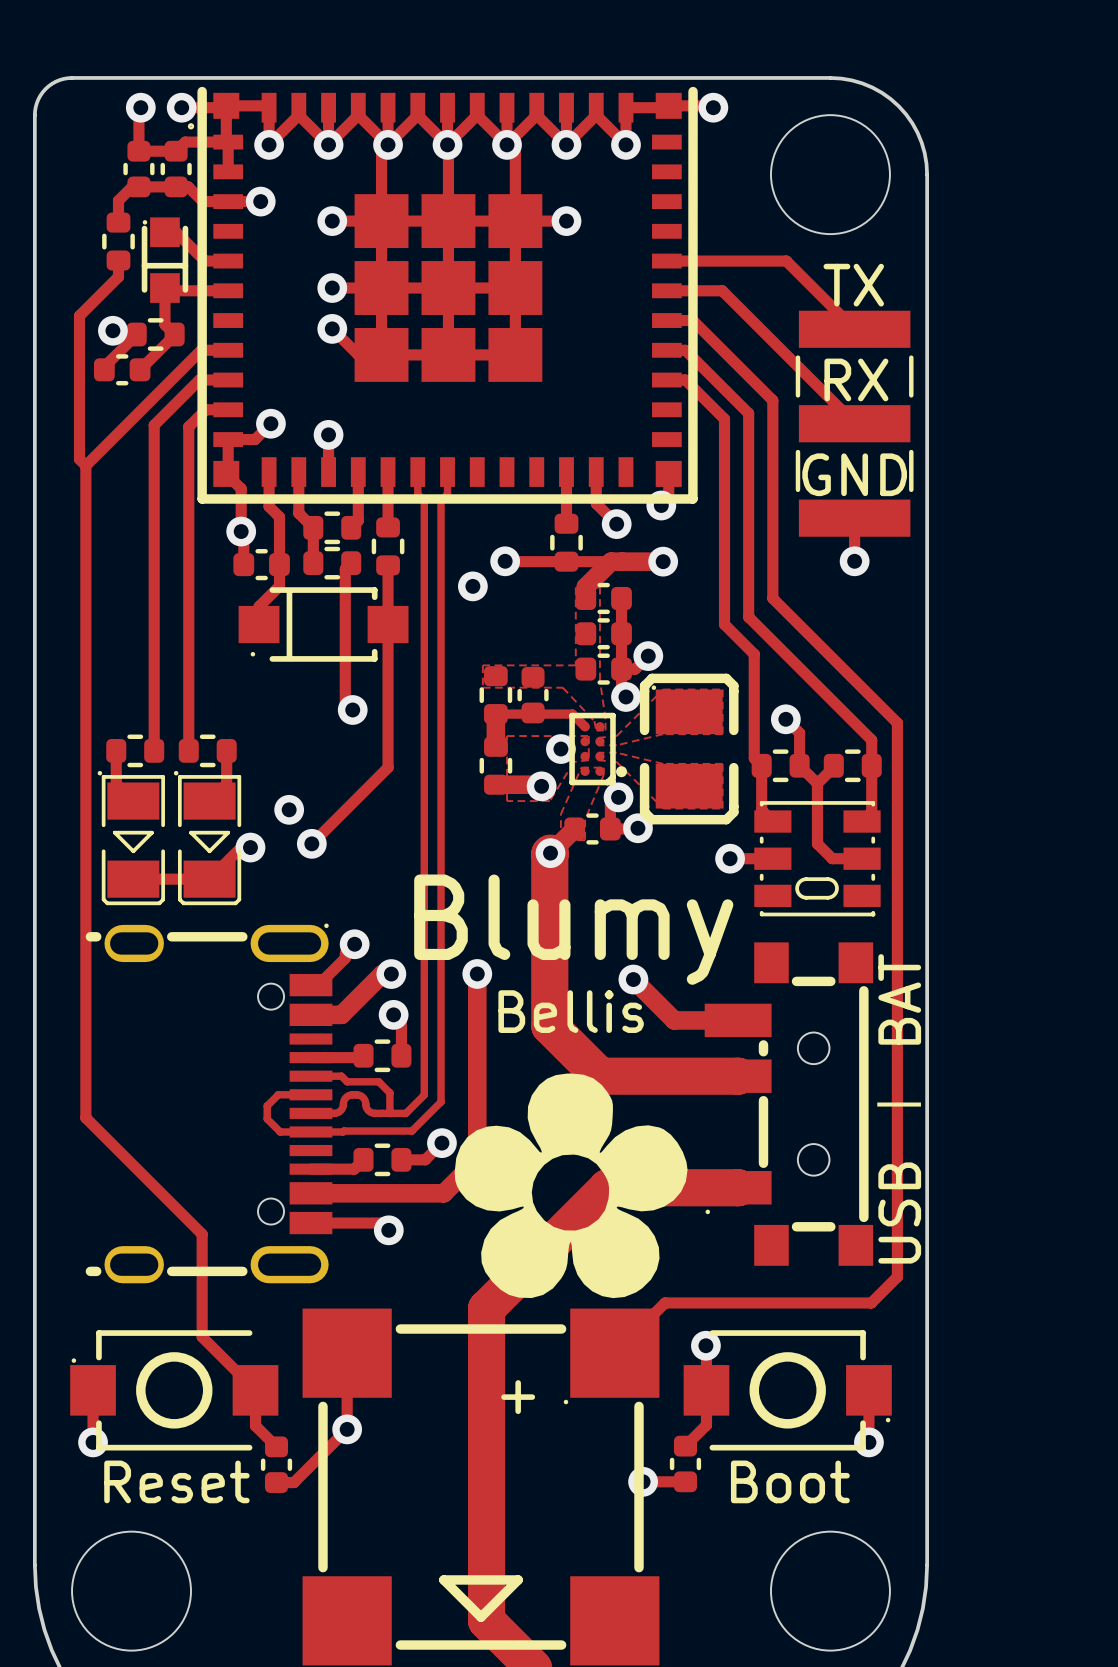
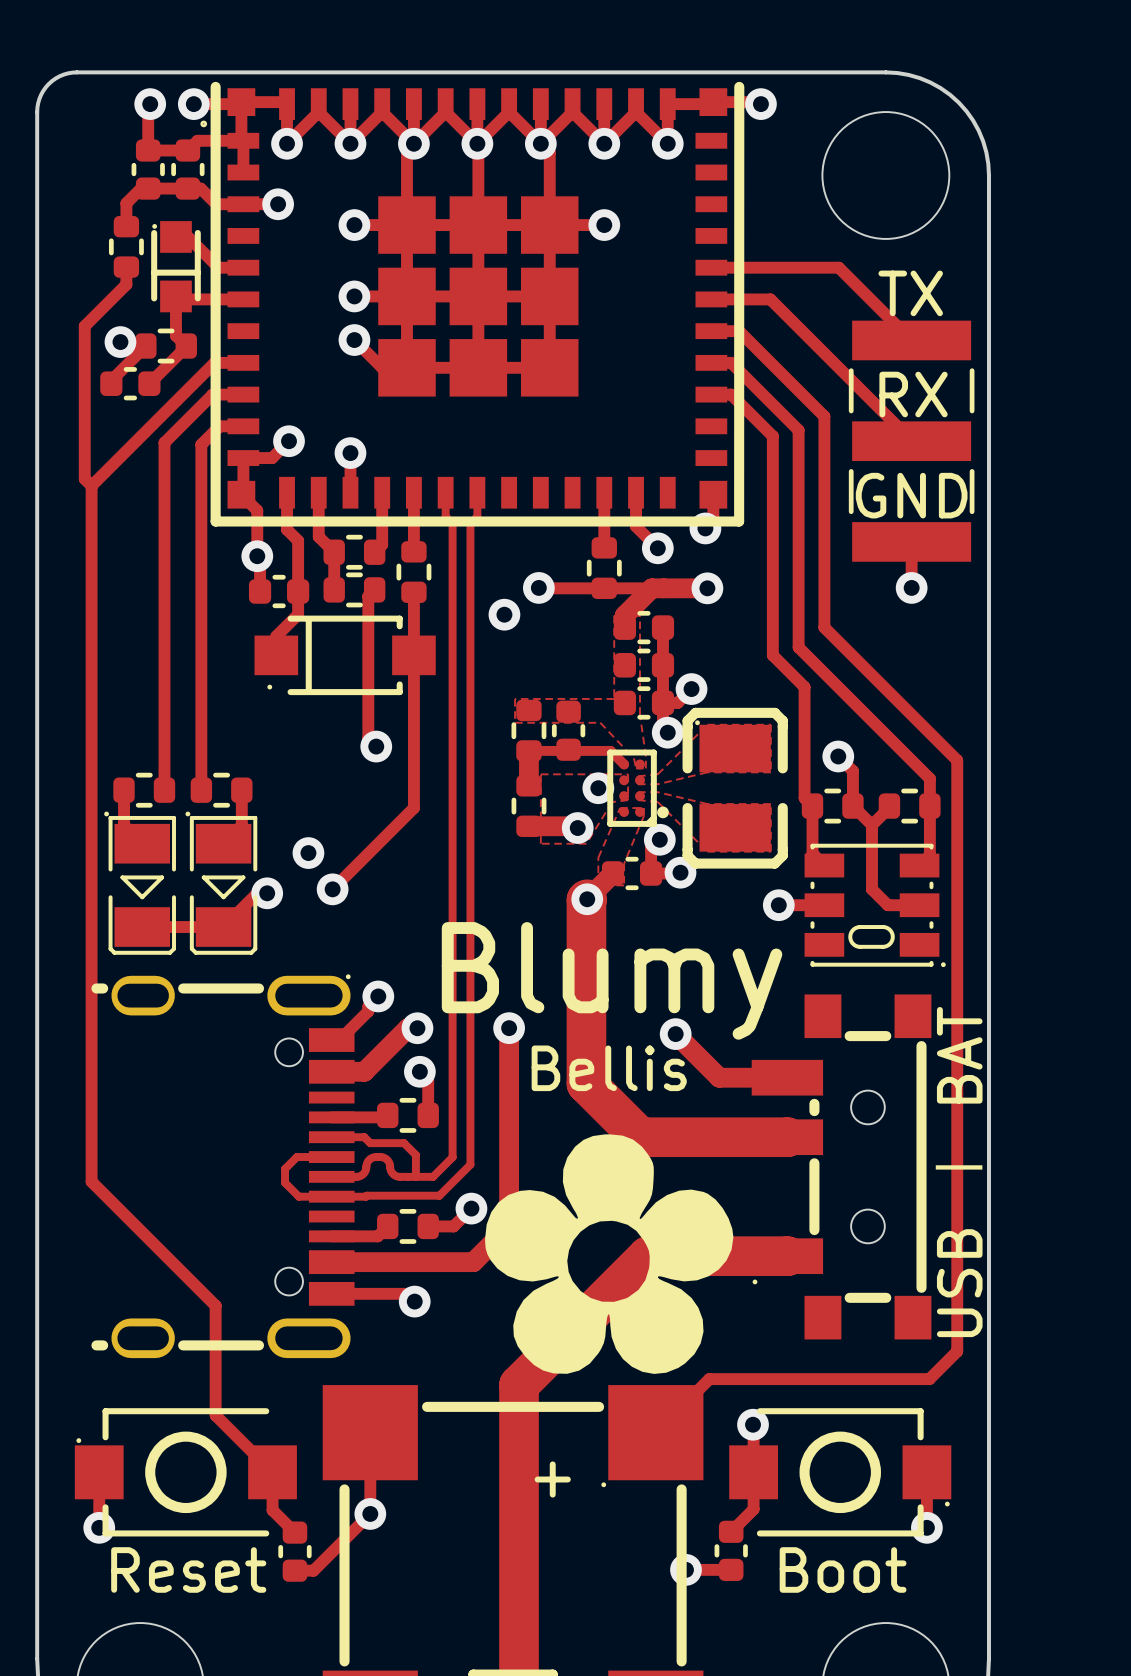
part footprint: [754, 801, 881, 917] -> [804, 843, 946, 968]

